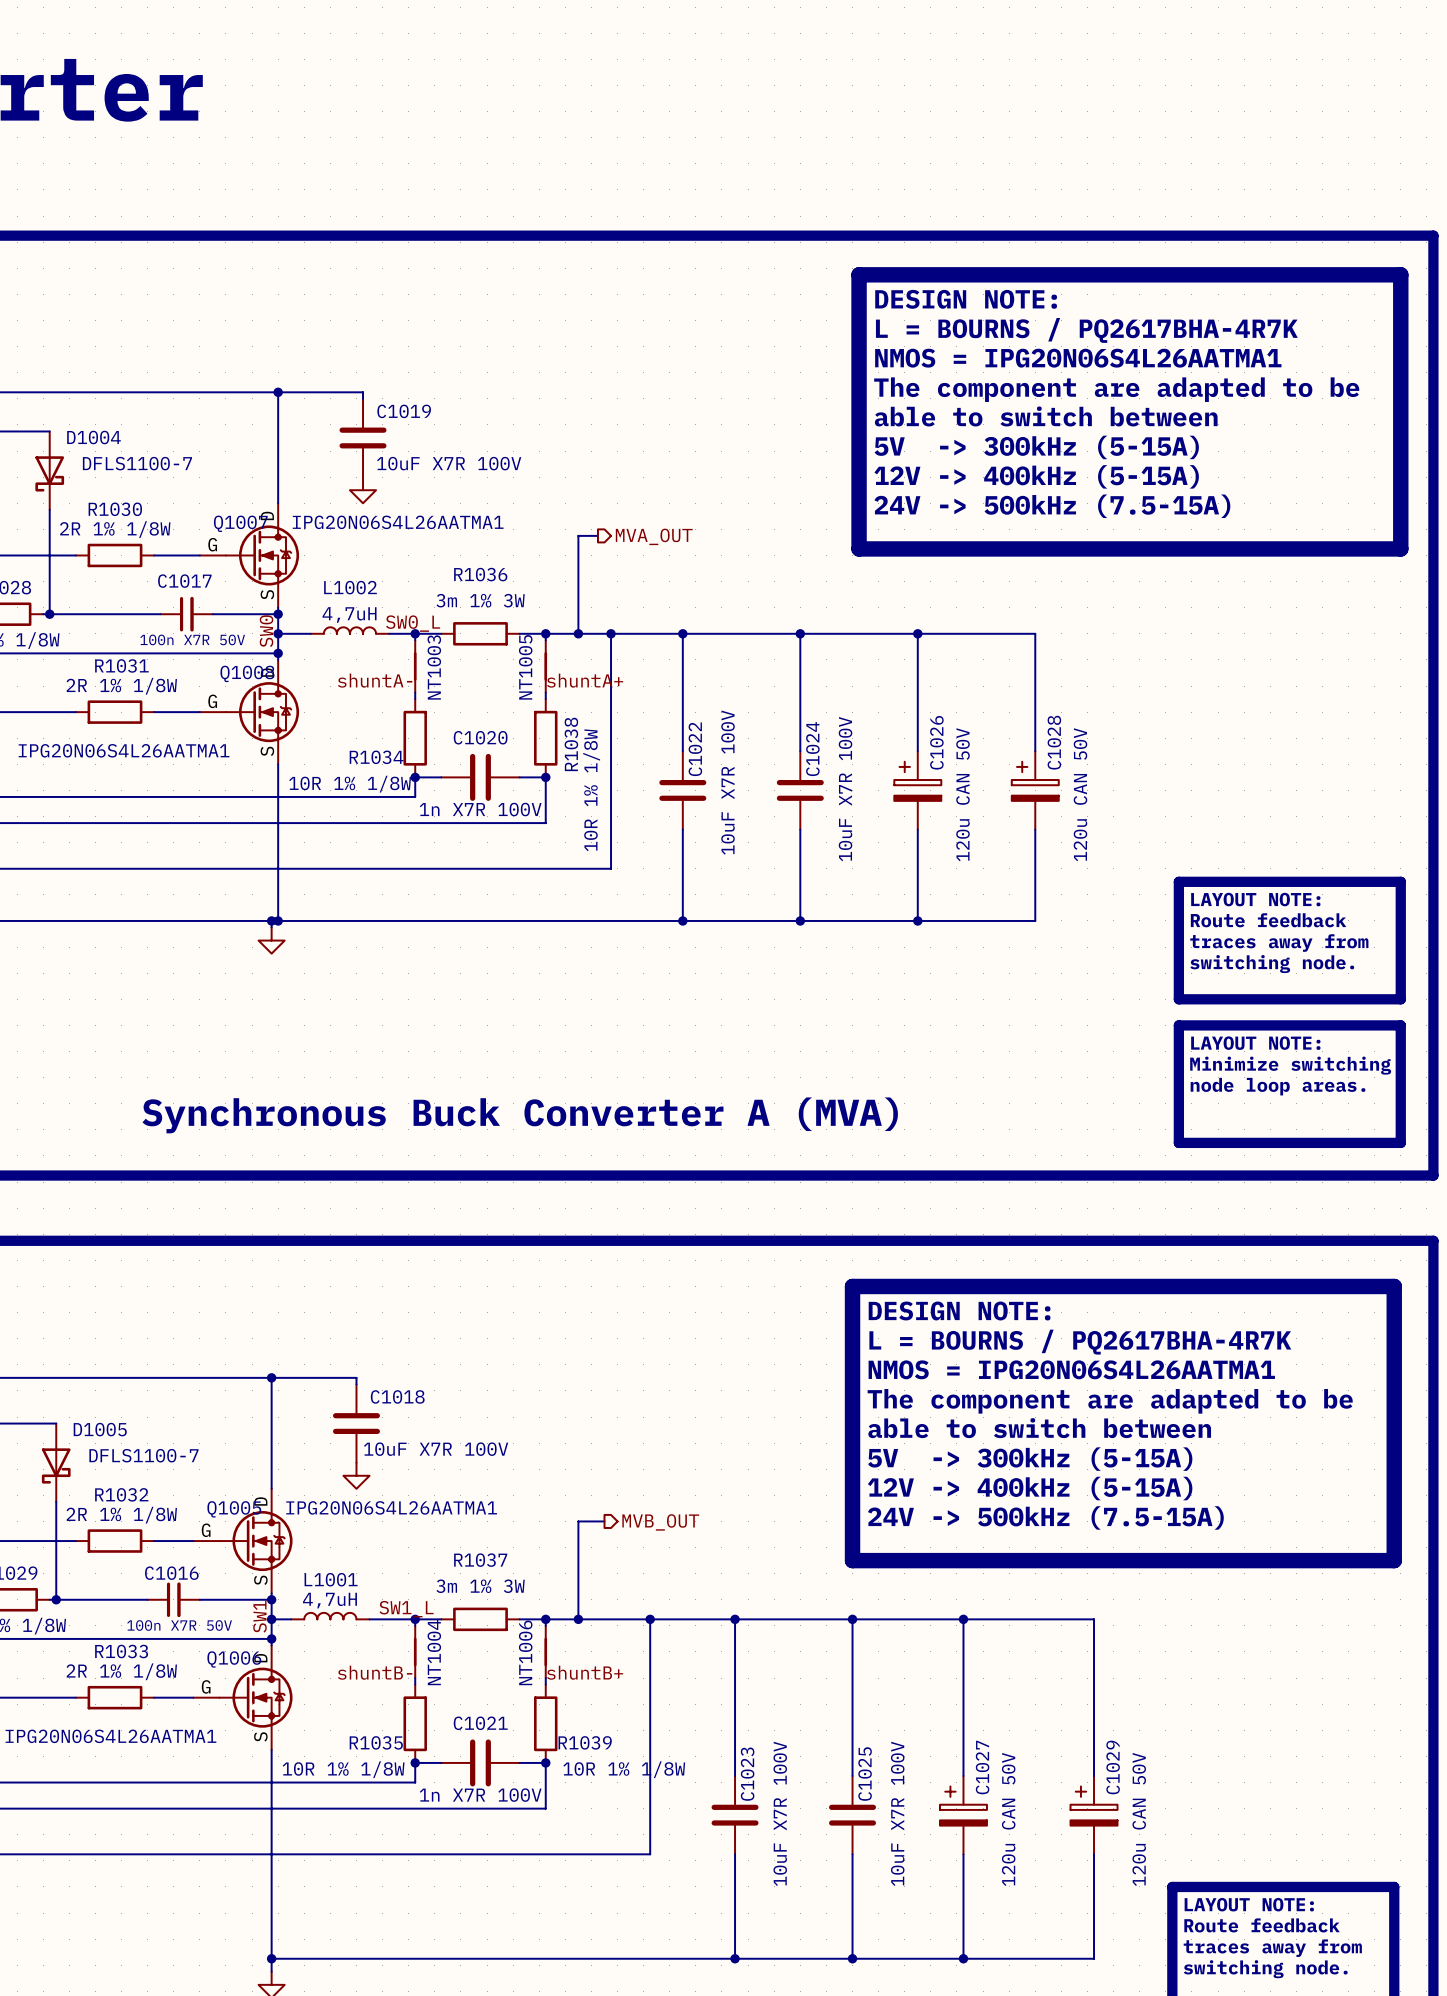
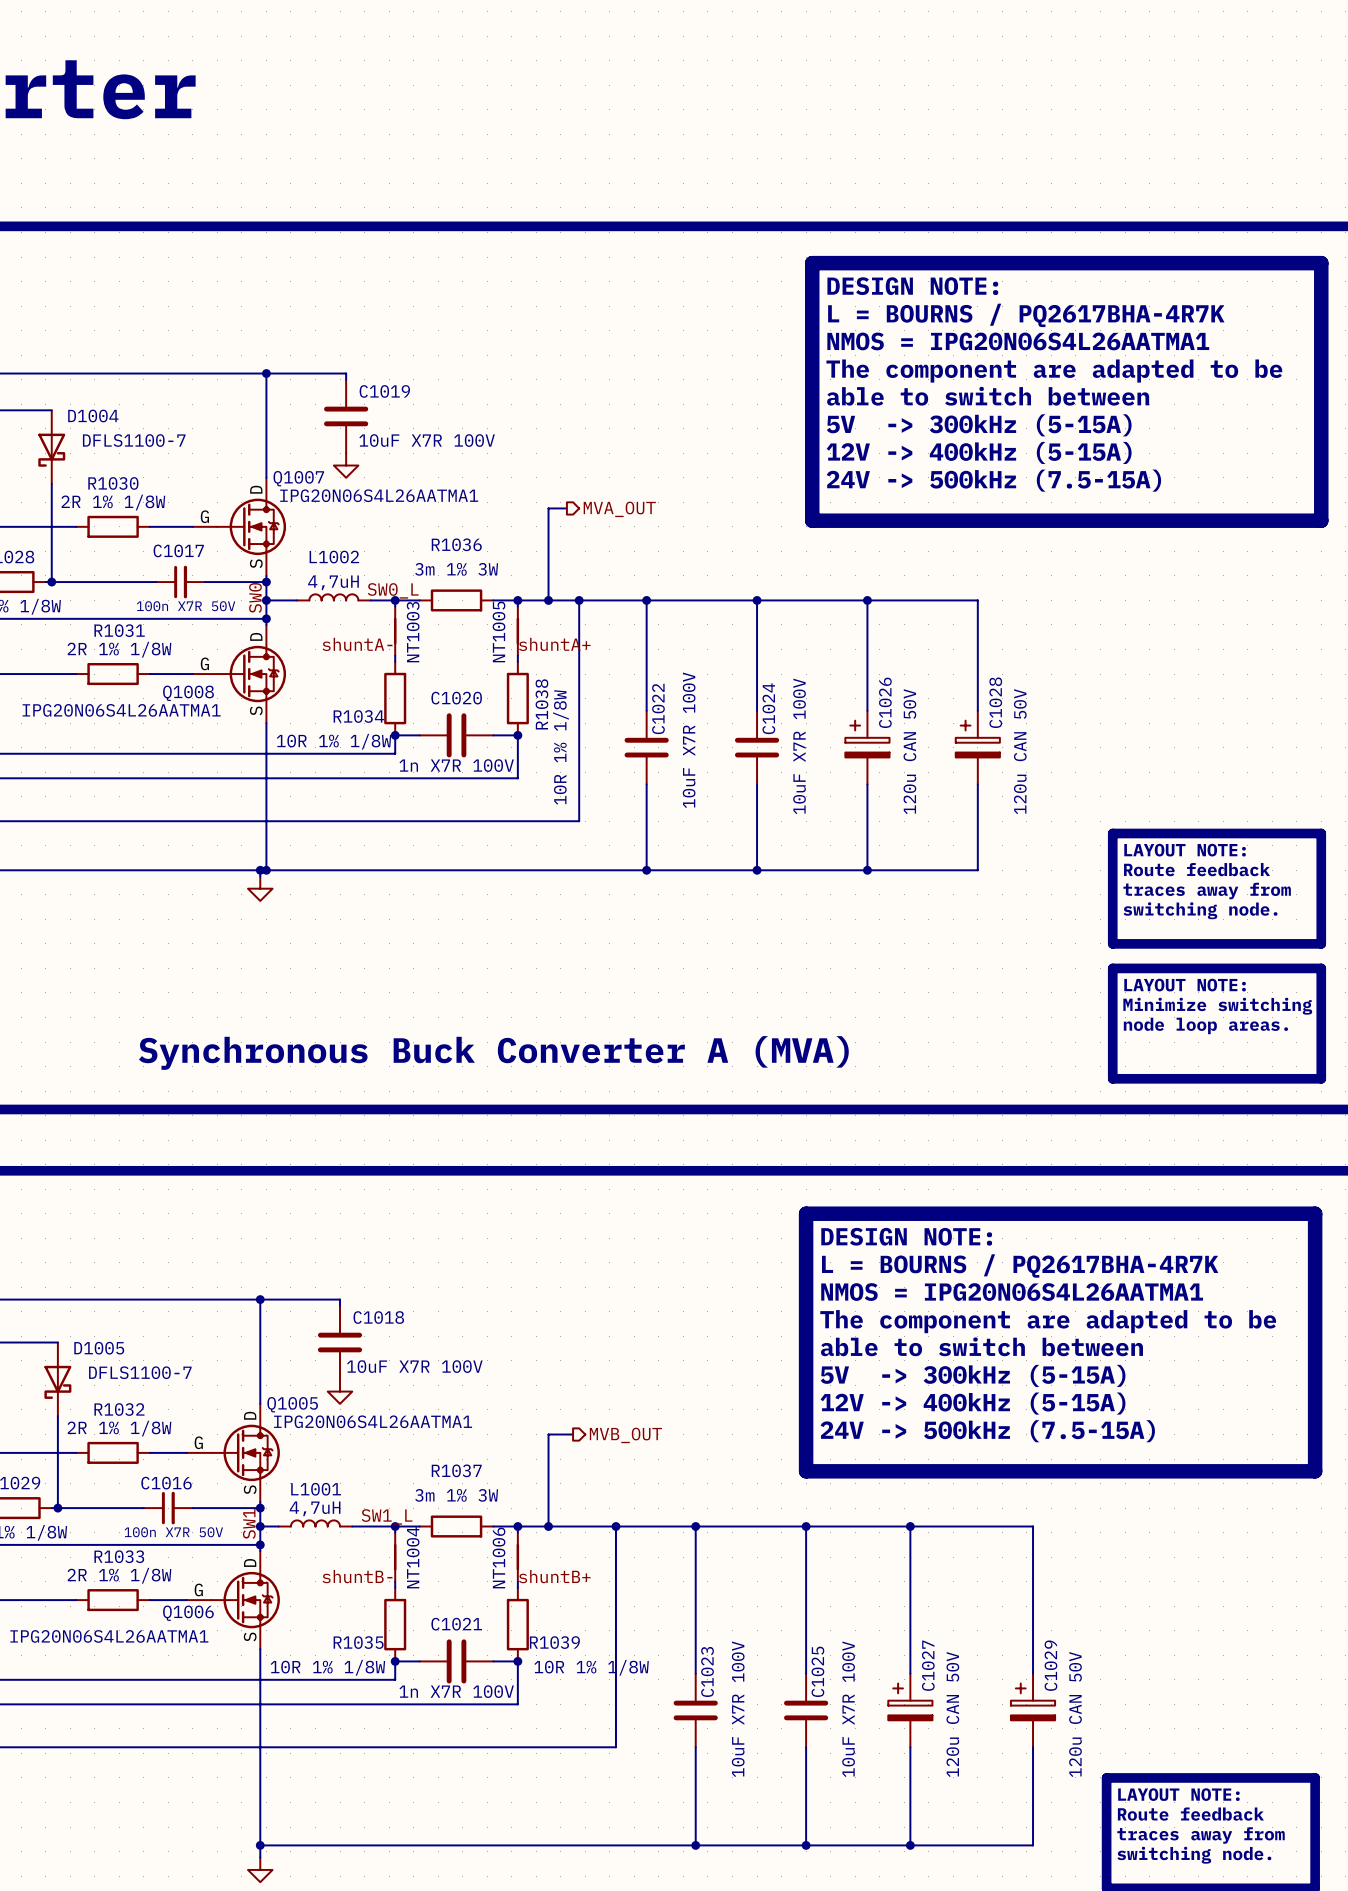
Q1007 name position: Q1007 (240, 523) -> Q1007 (298, 478)
Q1008 name position: Q1008 (247, 673) -> Q1008 (188, 693)
Q1005 name position: Q1005 (234, 1509) -> Q1005 (292, 1404)
Q1006 name position: Q1006 (234, 1659) -> Q1006 (188, 1613)

